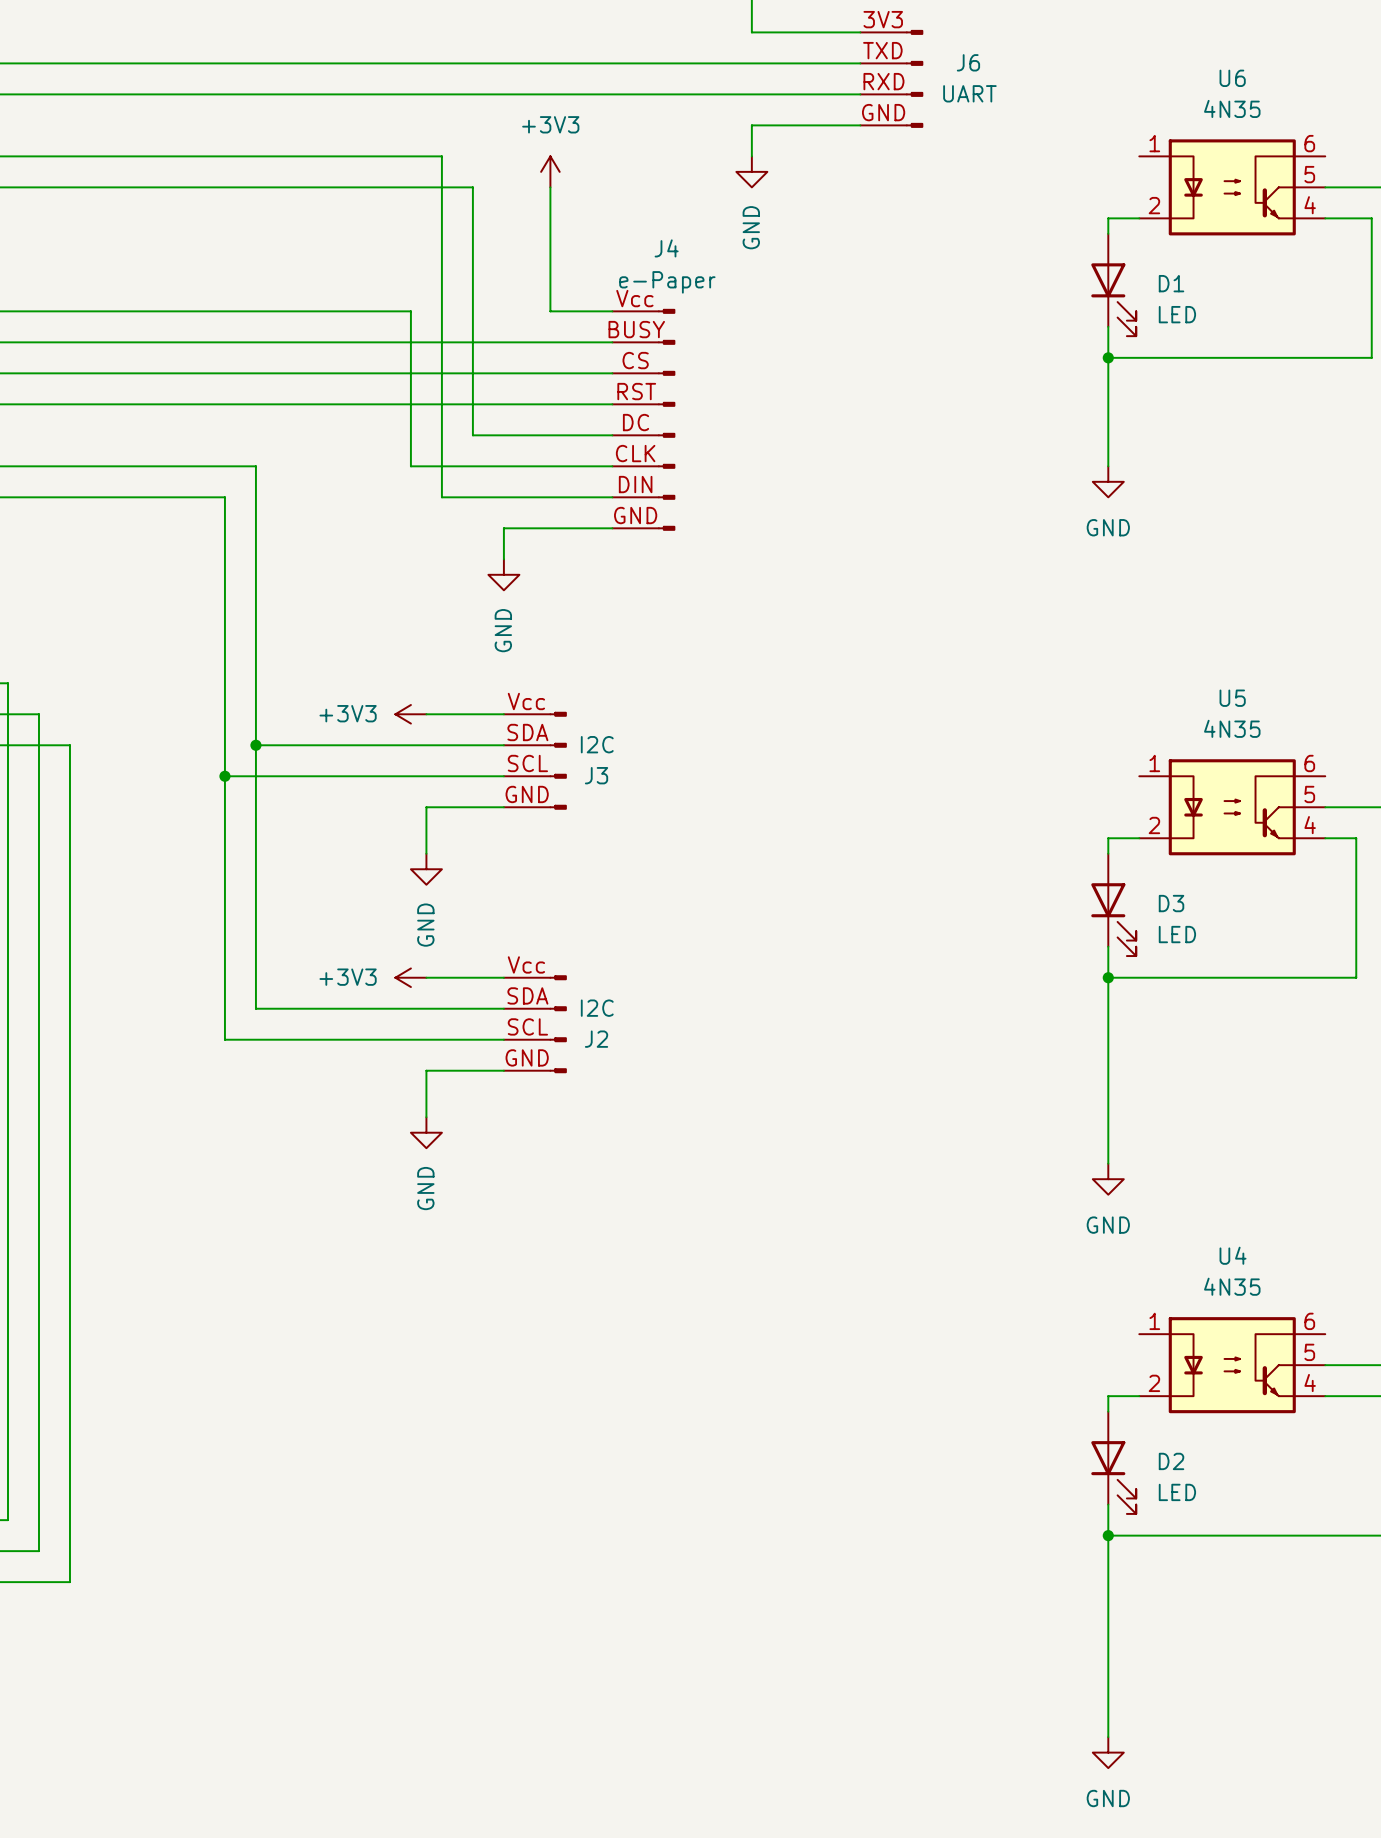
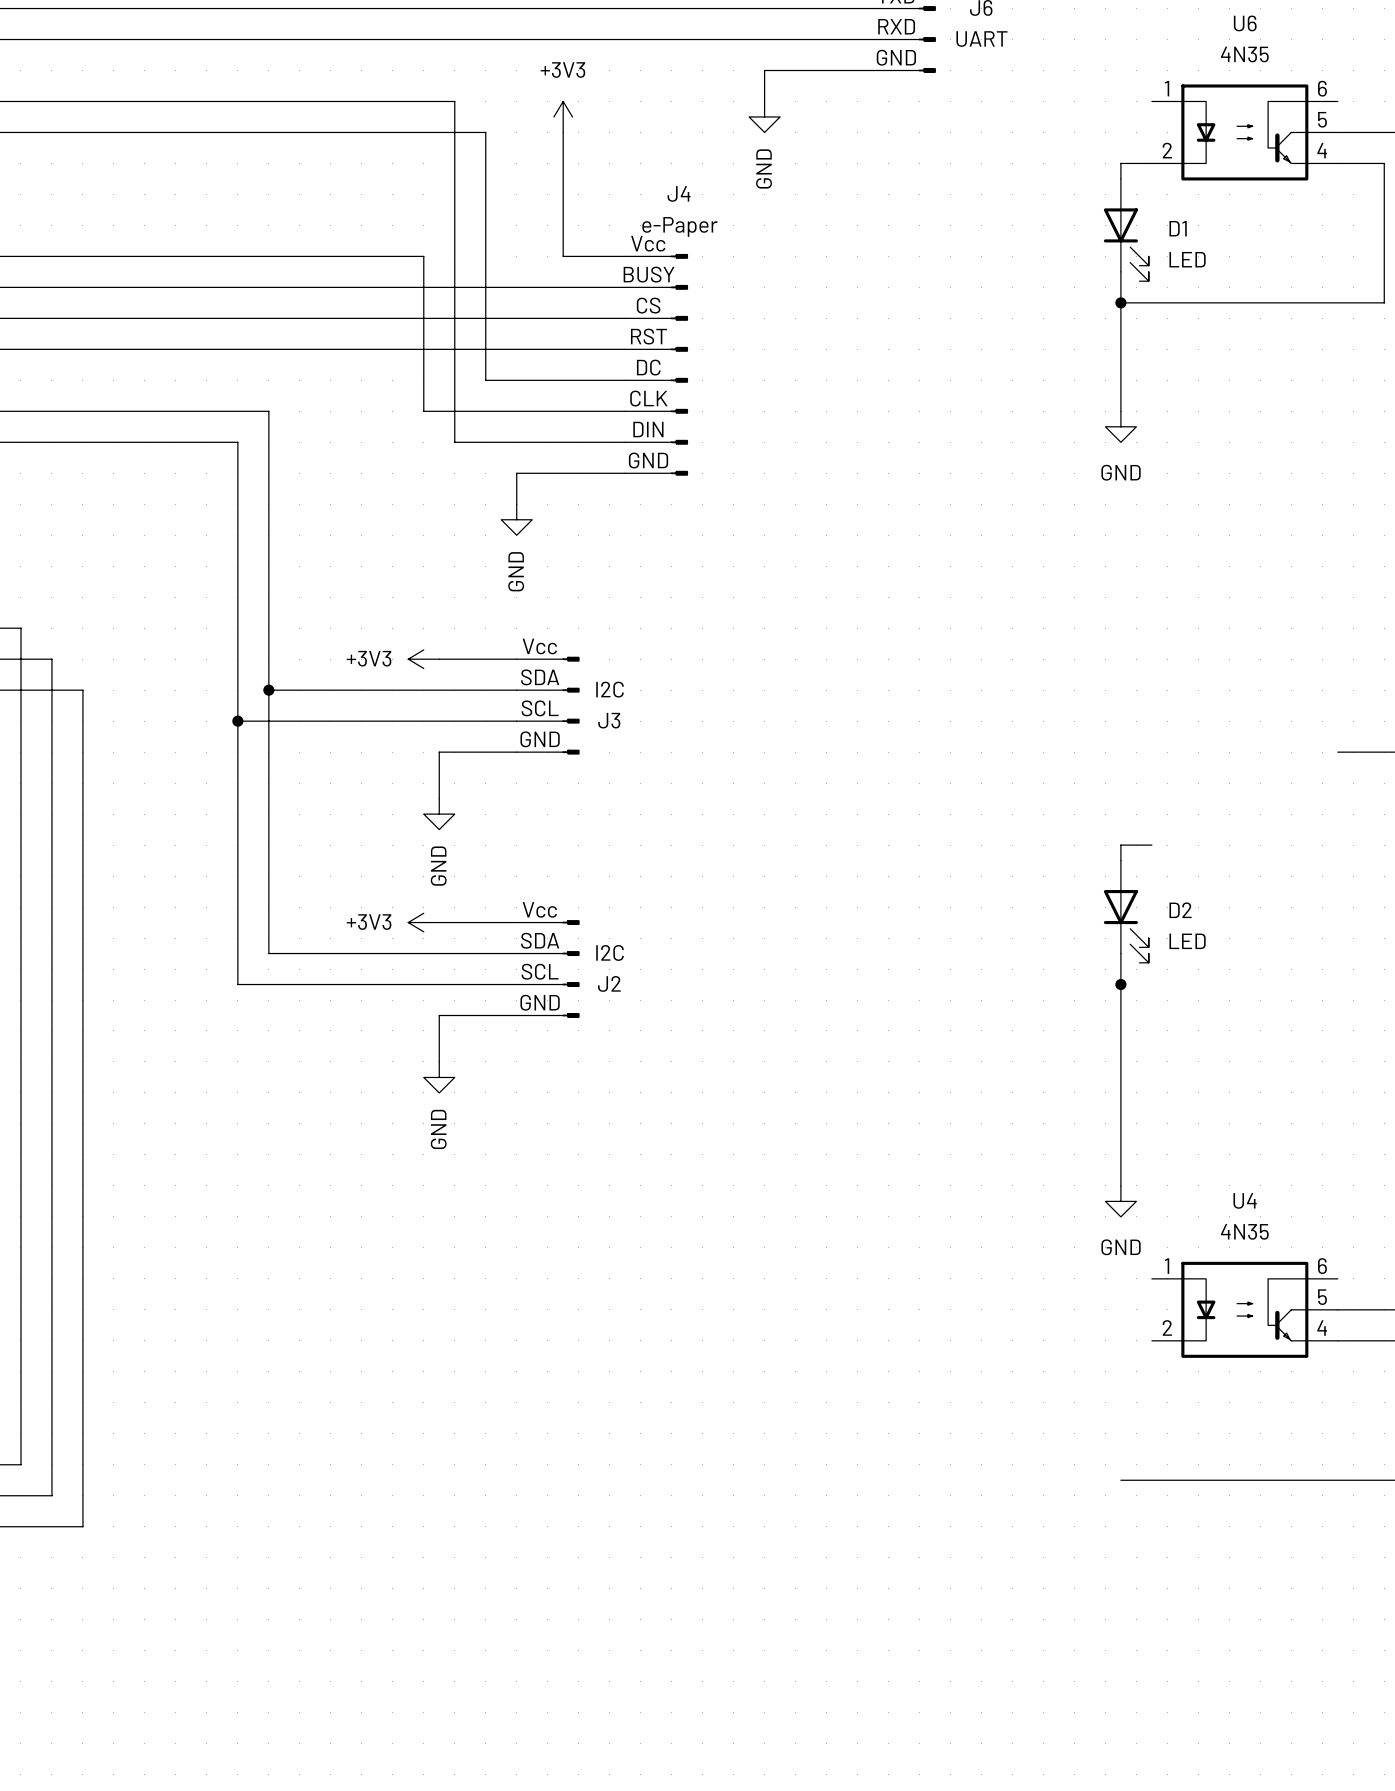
U5: 4N35 (1232, 807) -> none
wire: (1139, 838) (1108, 838) (1108, 853) -> (1151, 845) (1120, 845) (1120, 860)
wire: (1325, 838) (1356, 838) (1356, 977) (1108, 977) -> none
D3: LED (1113, 904) -> none
junction position: (1108, 977) -> (1120, 984)
wire: none -> (1120, 1108) (1120, 1185)
power symbol position: GND (1108, 1179) -> GND (1120, 1201)
wire: (1139, 1396) (1108, 1396) (1108, 1411) -> none
D2 position: (1113, 1462) -> (1126, 911)
wire: (1108, 1504) (1108, 1737) -> none
junction: (1108, 1535) -> none
power symbol: GND (1108, 1752) -> none

